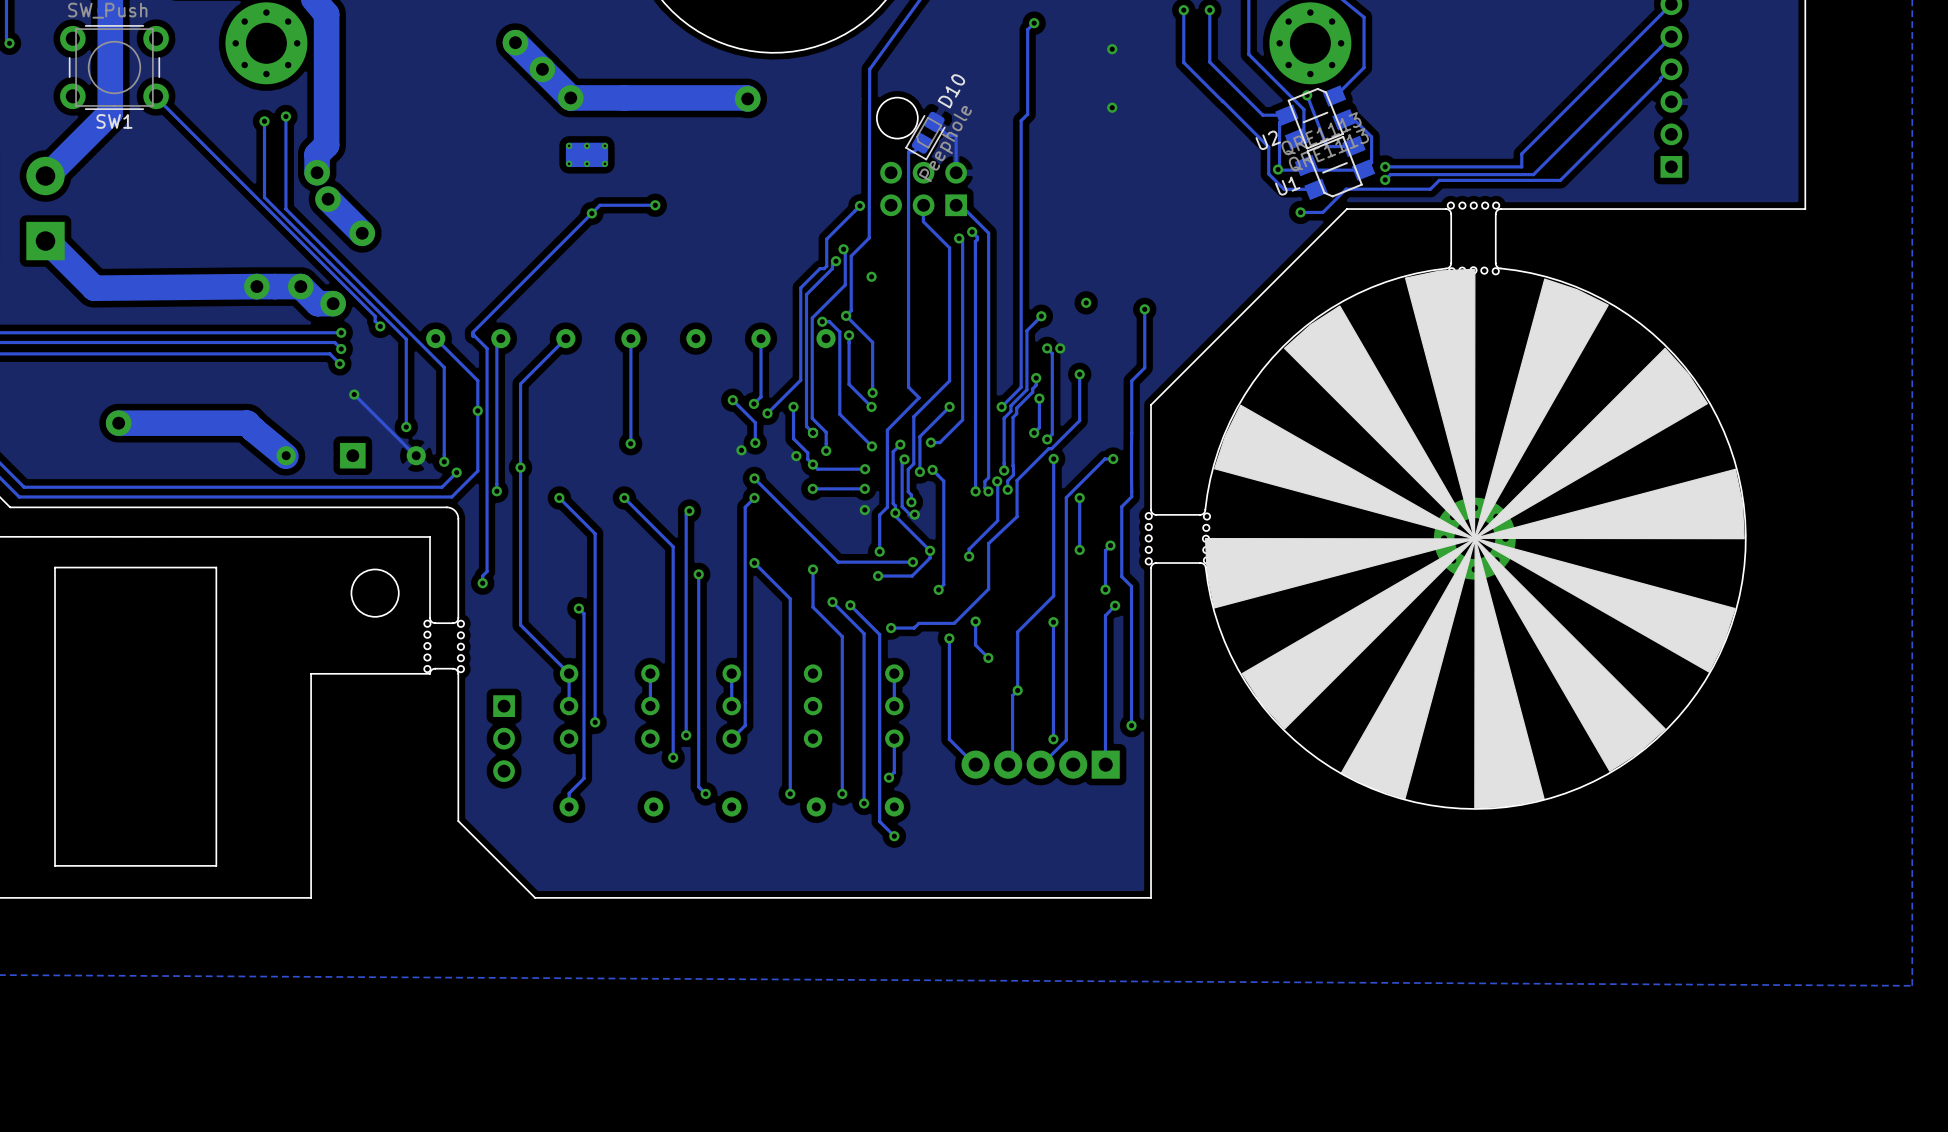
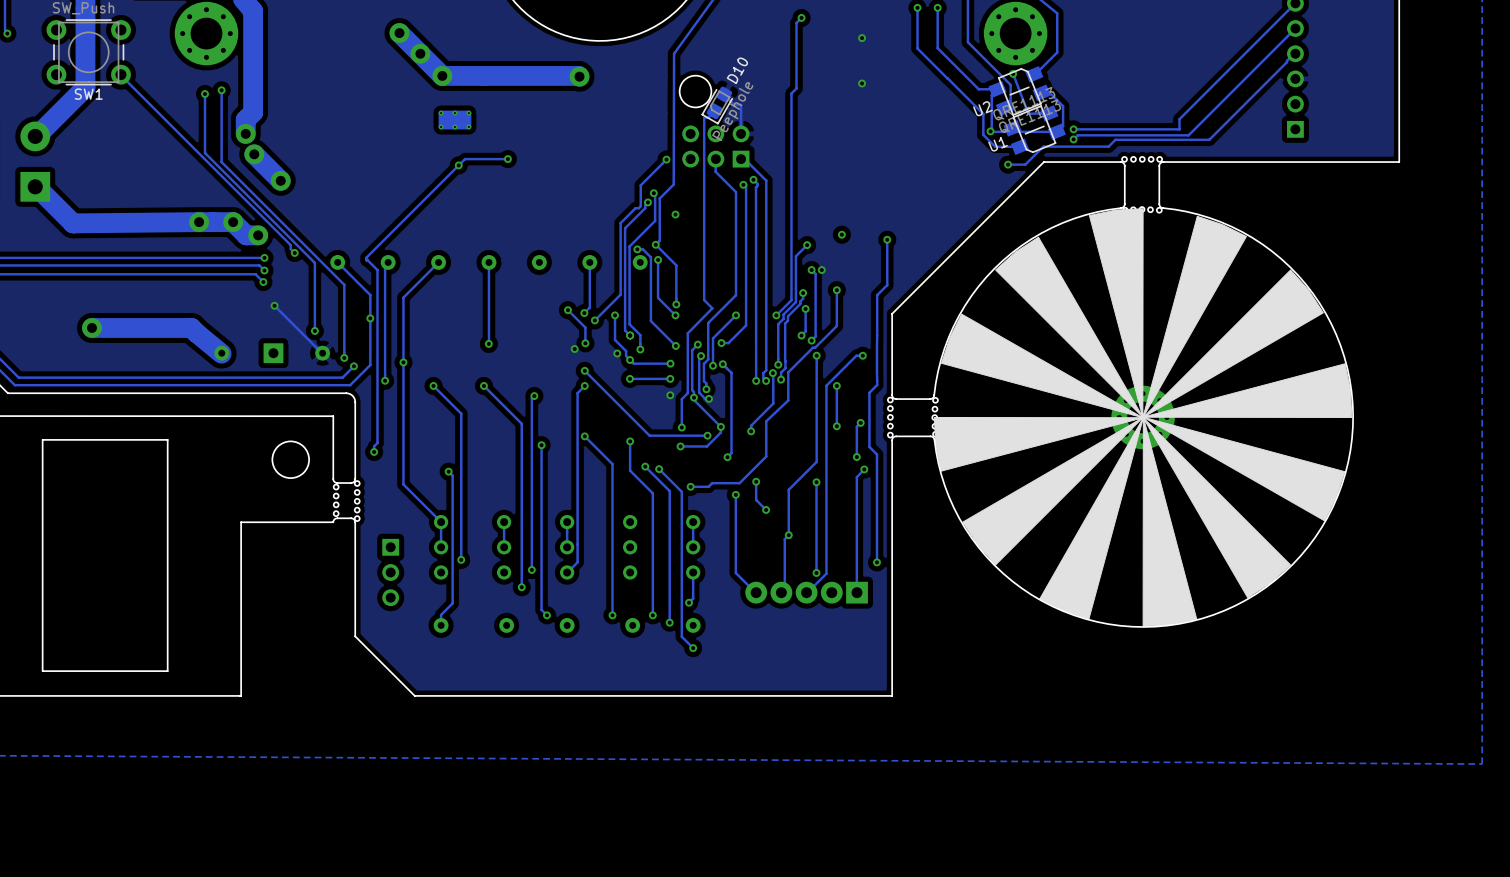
part footprint: [424, 620, 431, 673] -> [333, 484, 339, 517]

